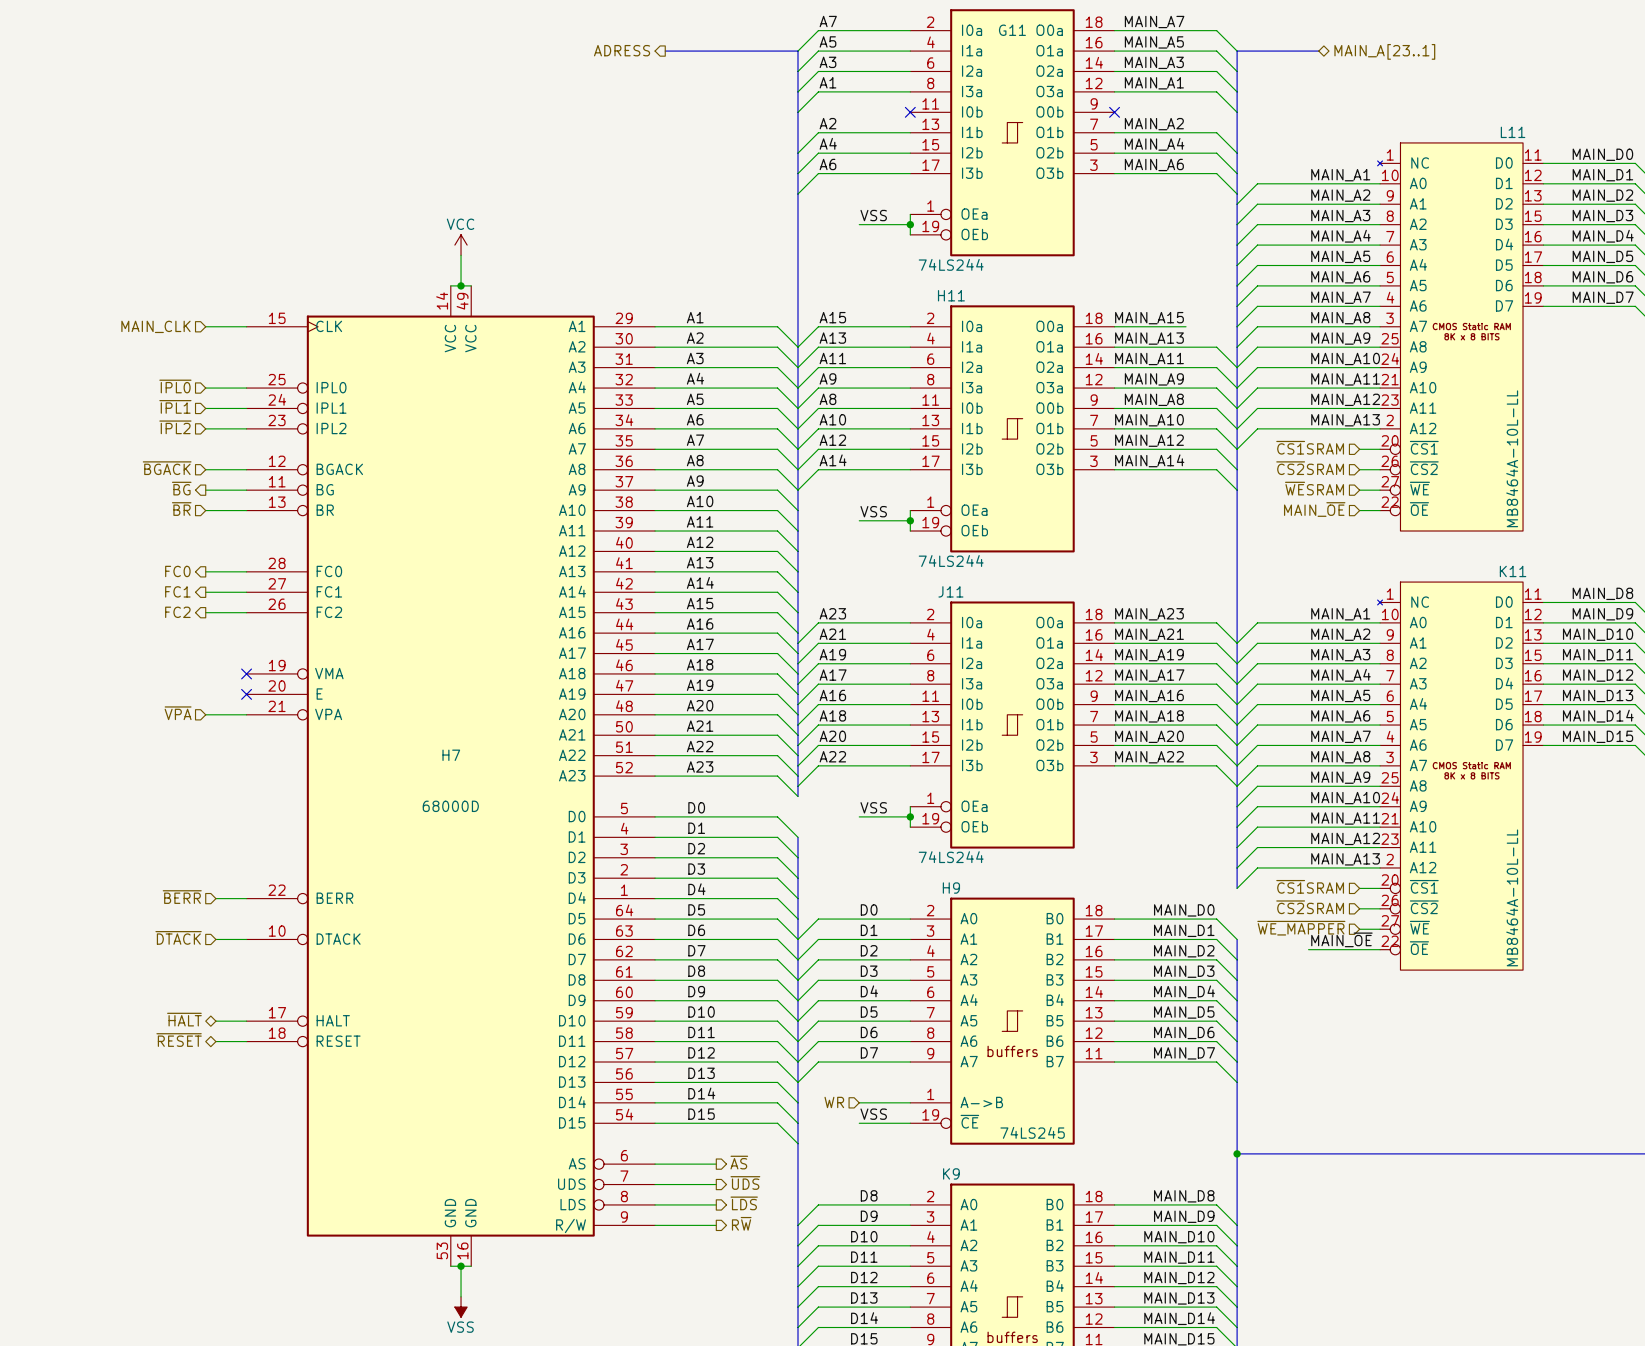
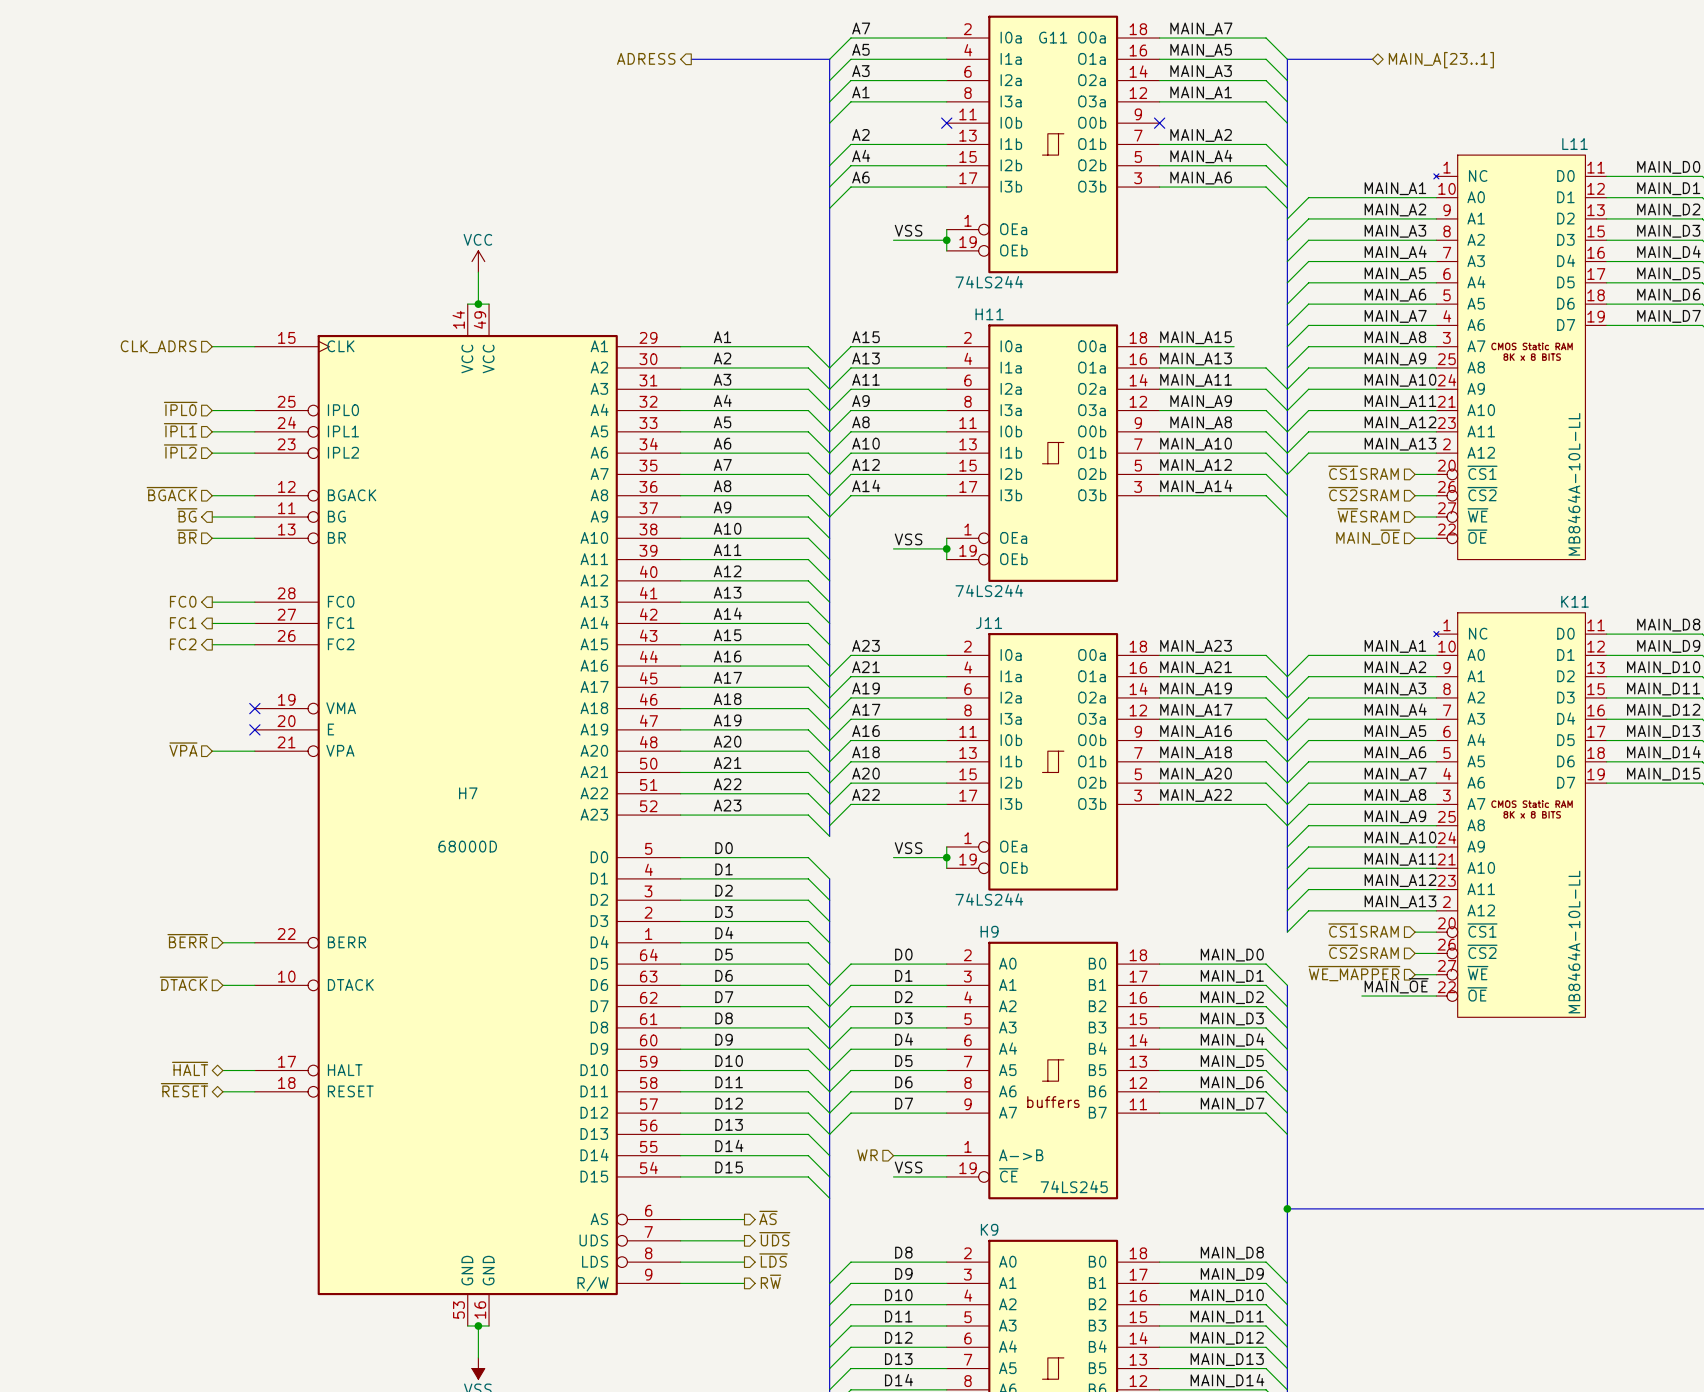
hierarchical label: MAIN_CLK (155, 326) -> CLK_ADRS (158, 346)

